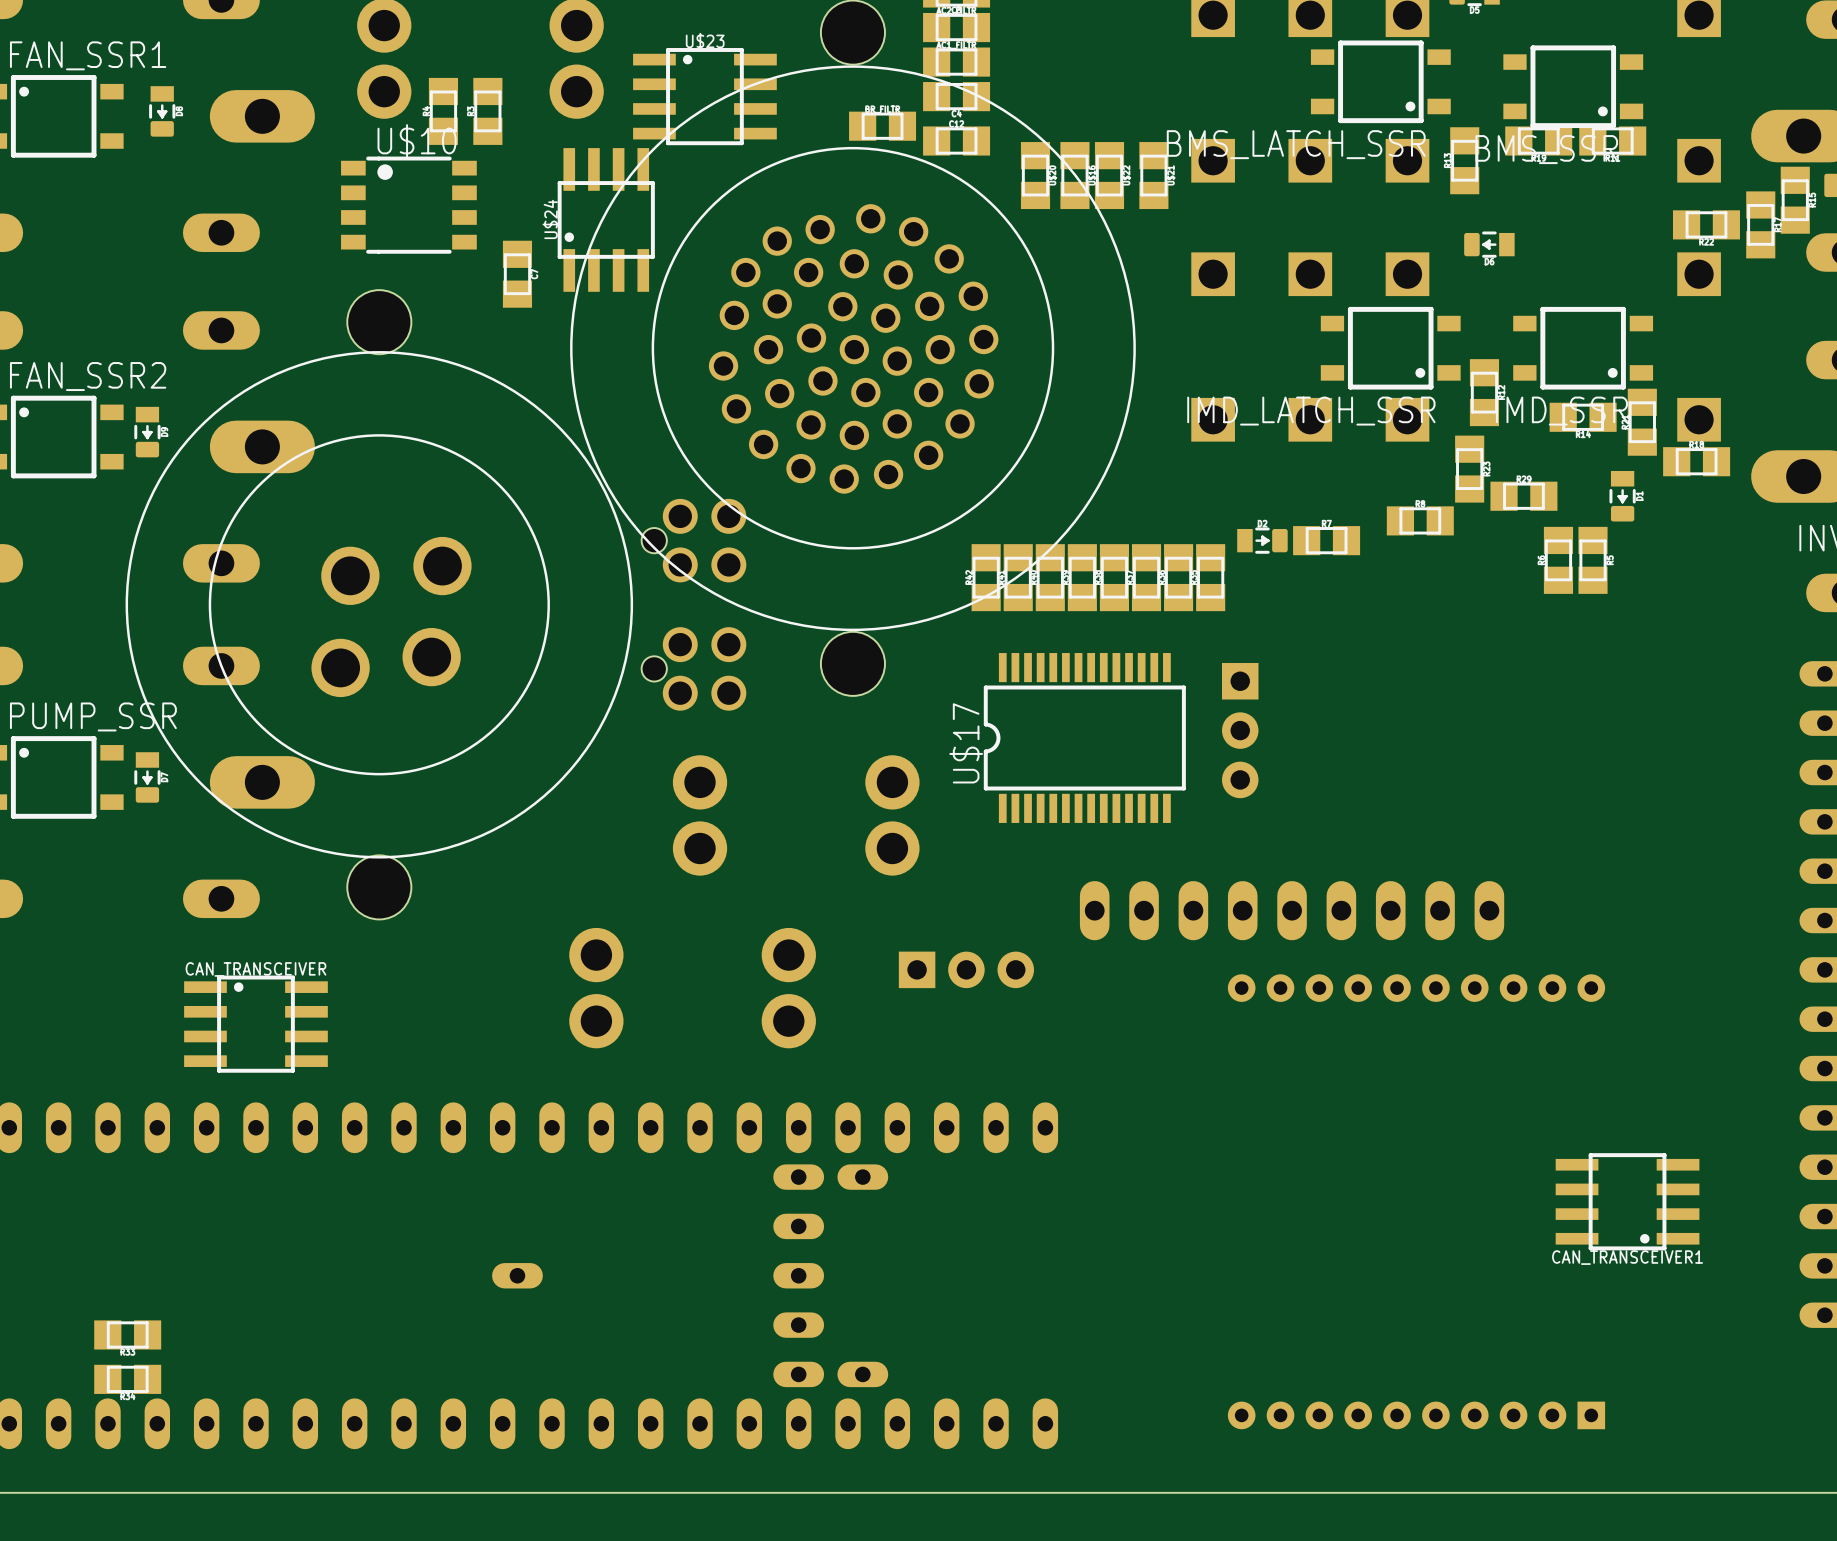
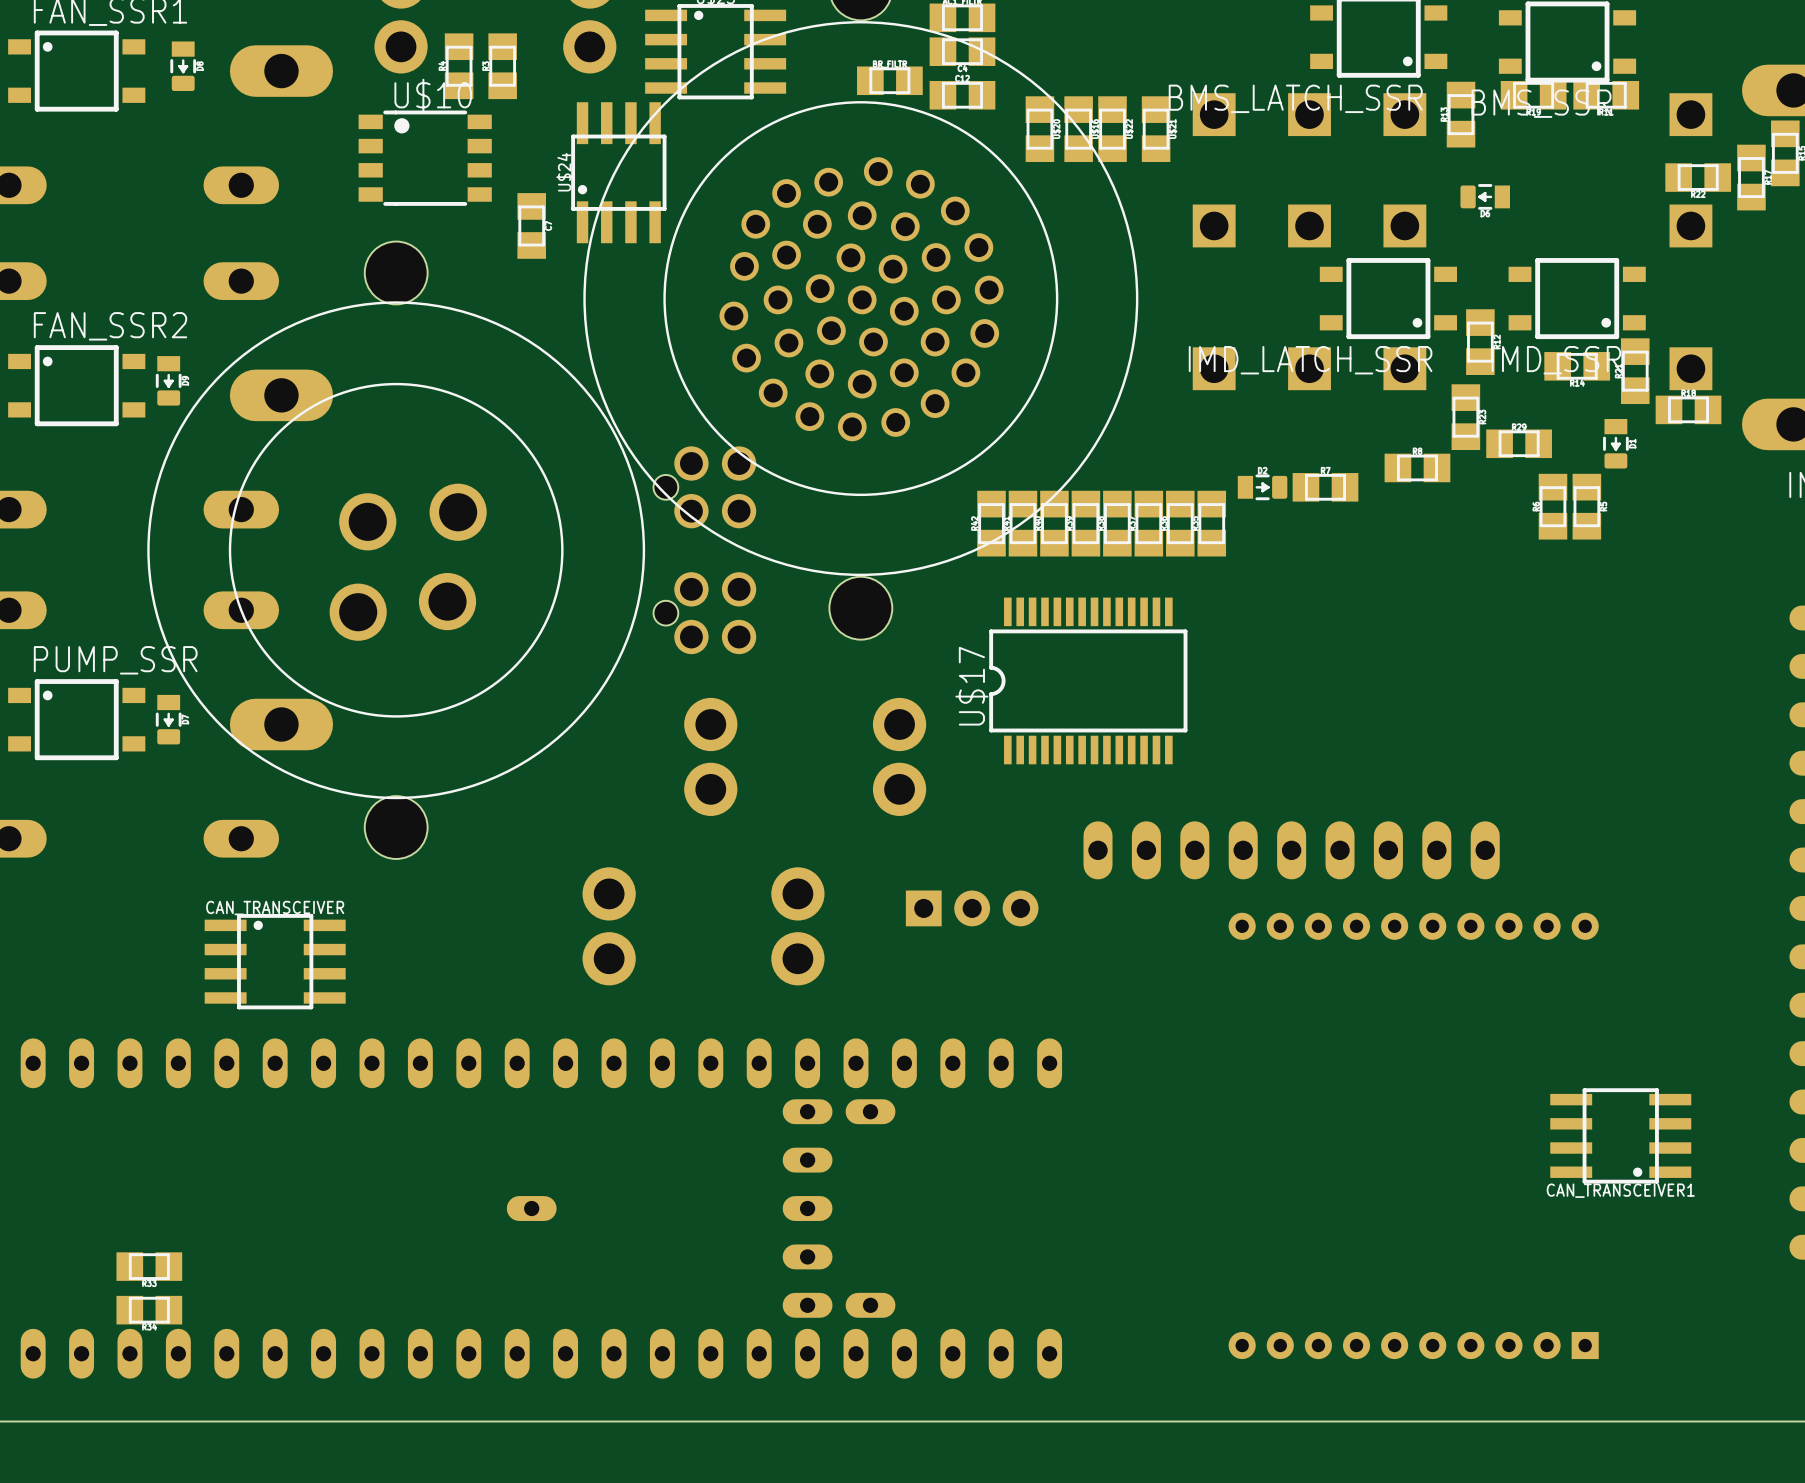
part: (1240, 730) -> none

